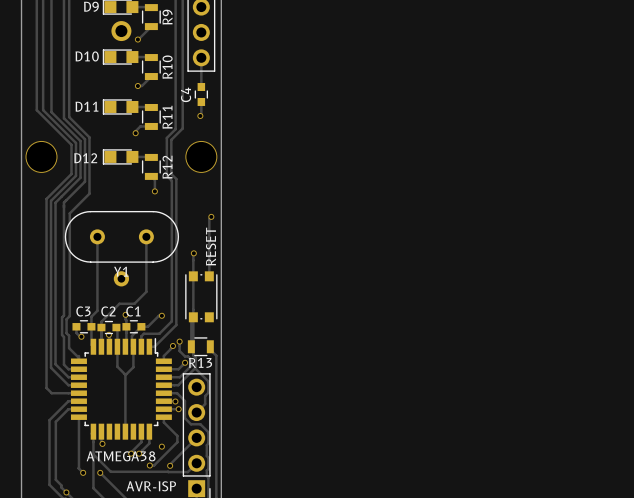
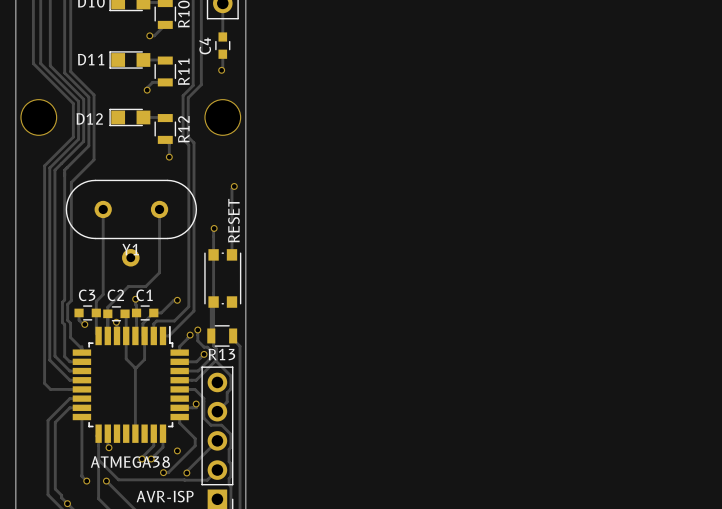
via: (175, 401) -> none
via: none -> (196, 404)
via: (178, 409) -> none

